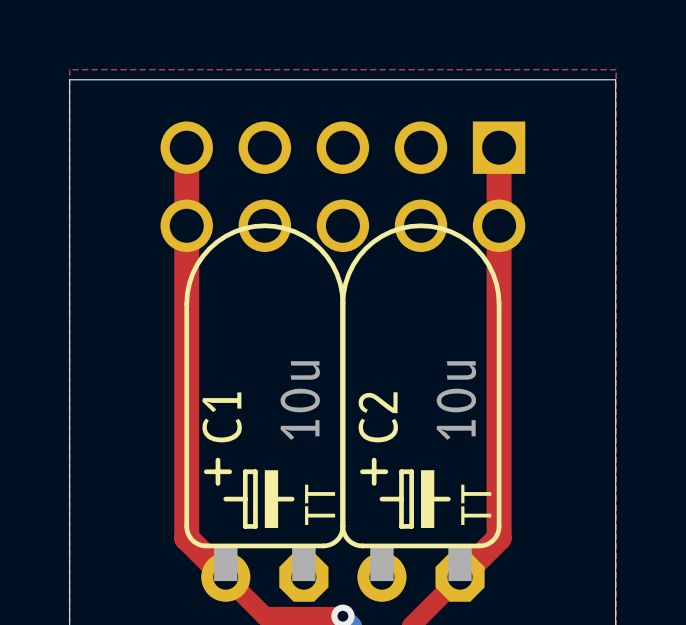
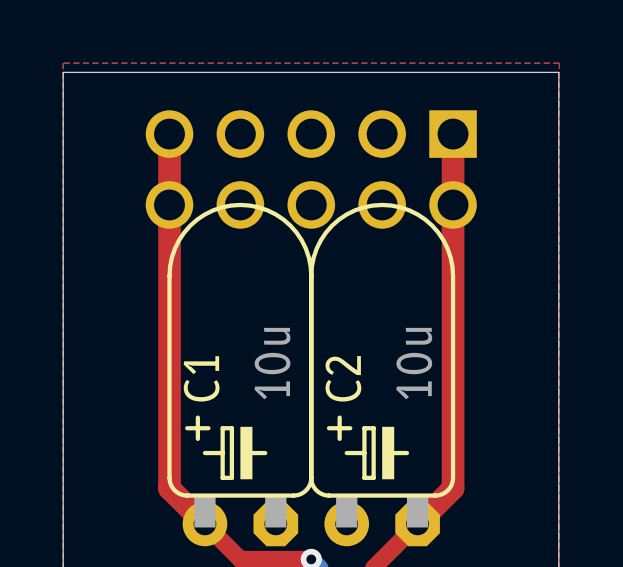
C1 text: TT (320, 504) -> none
C2 text: TT (476, 504) -> none

